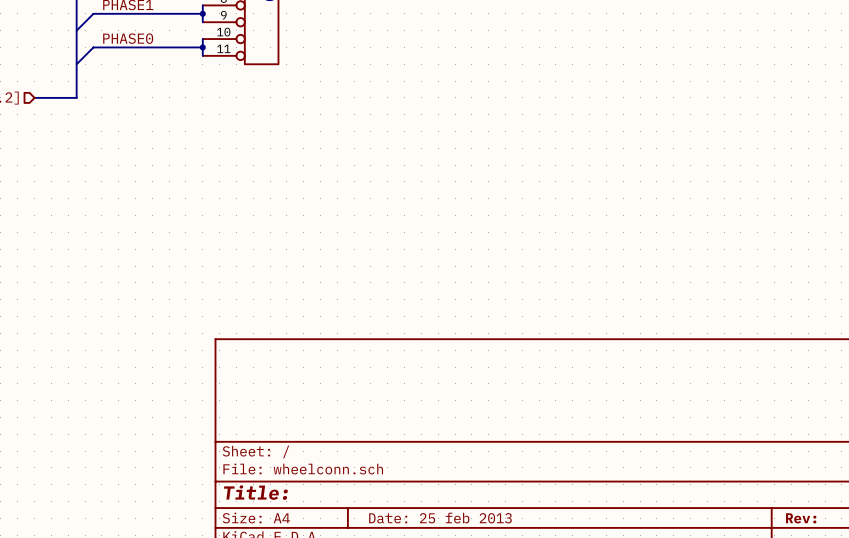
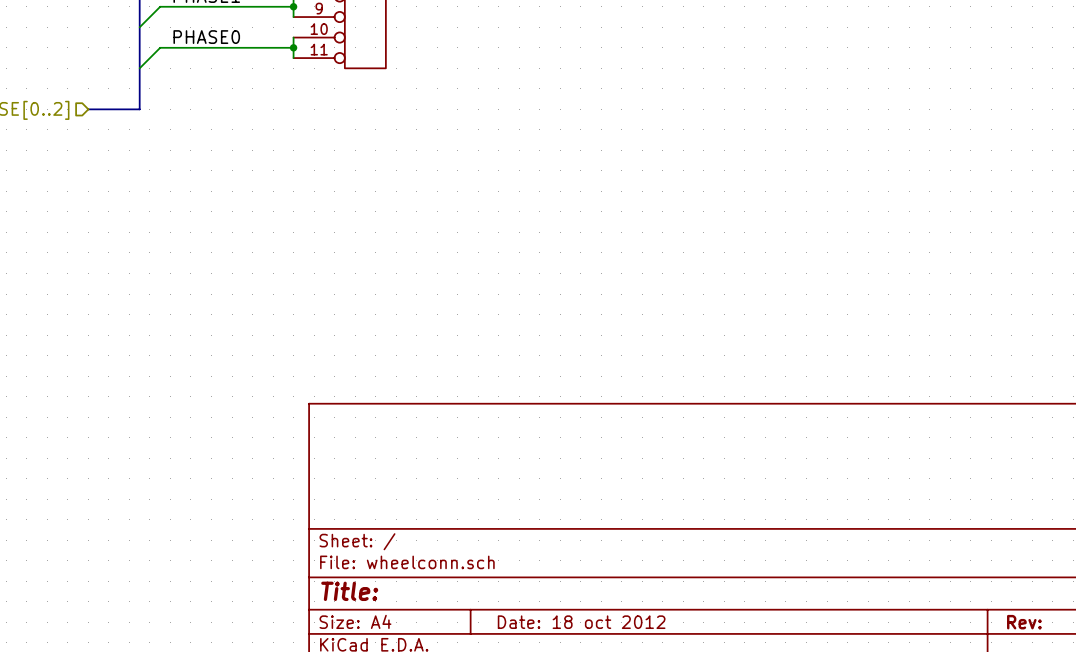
title block: Date: 25 feb 2013 (440, 518) -> Date: 18 oct 2012 (581, 622)

